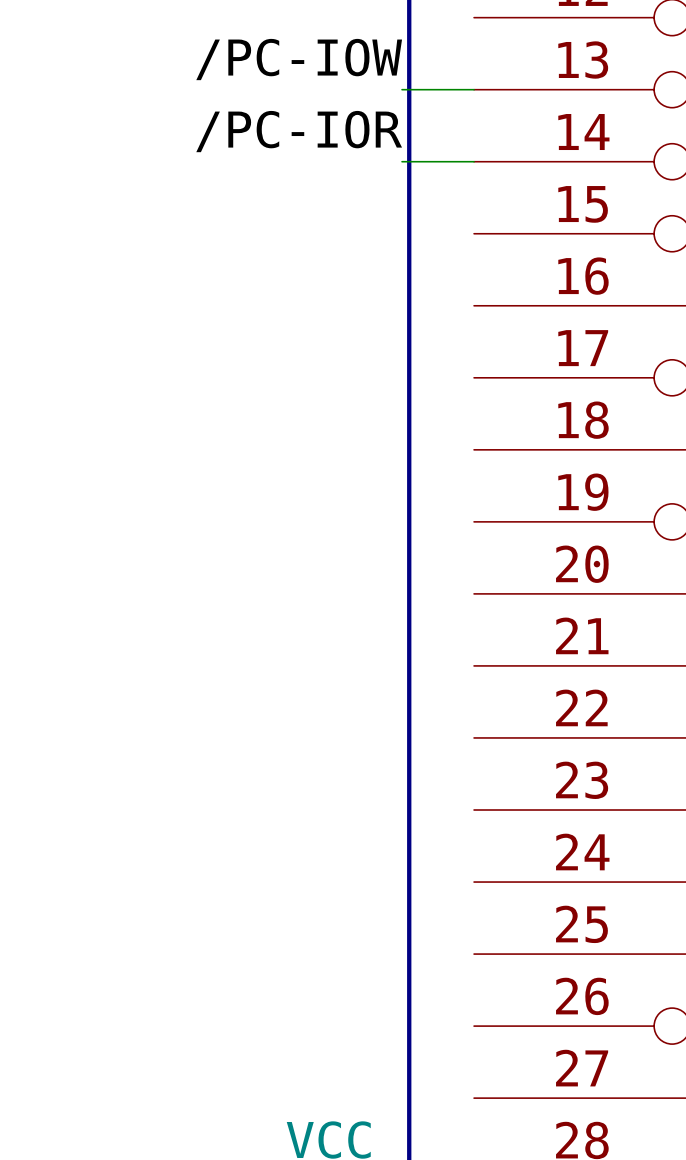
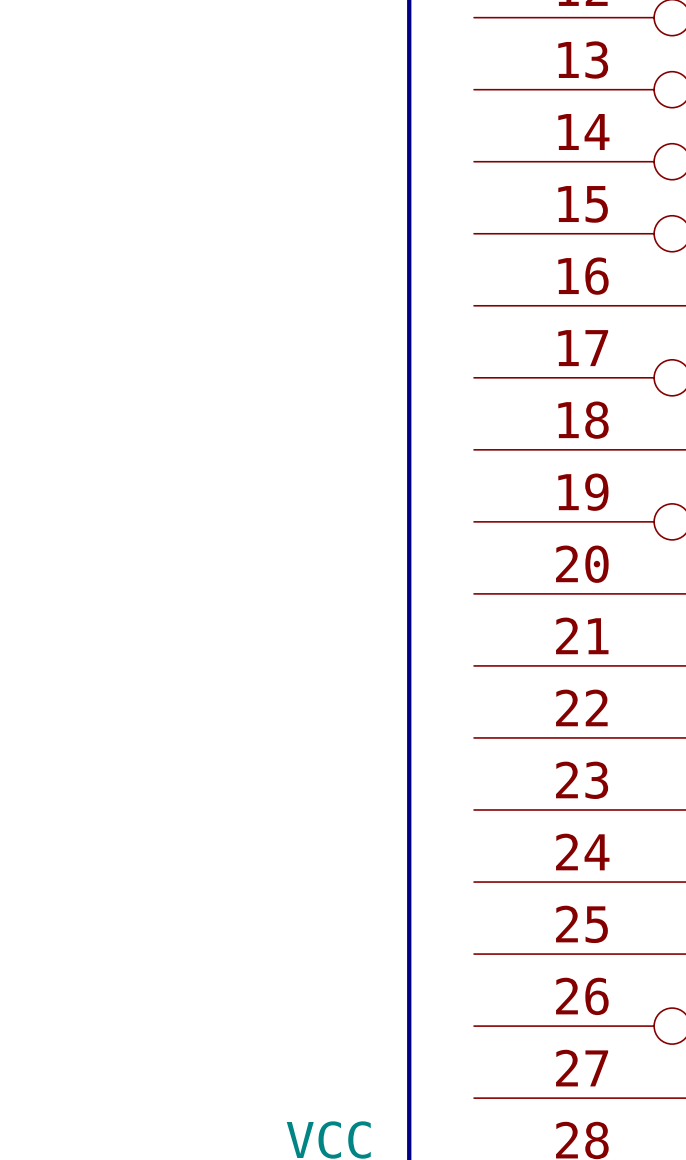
label: /PC-IOW (299, 59) -> none
wire: (402, 89) (474, 89) -> none
label: /PC-IOR (299, 131) -> none
wire: (402, 161) (474, 161) -> none

